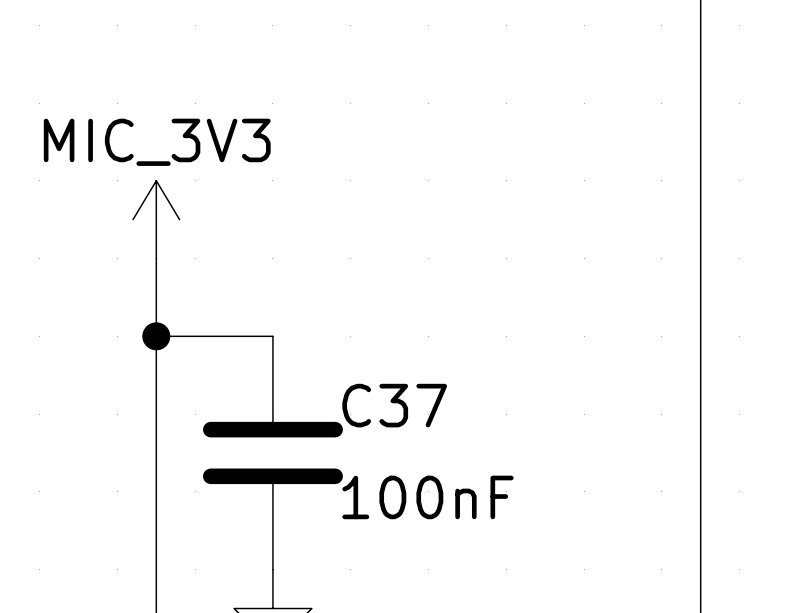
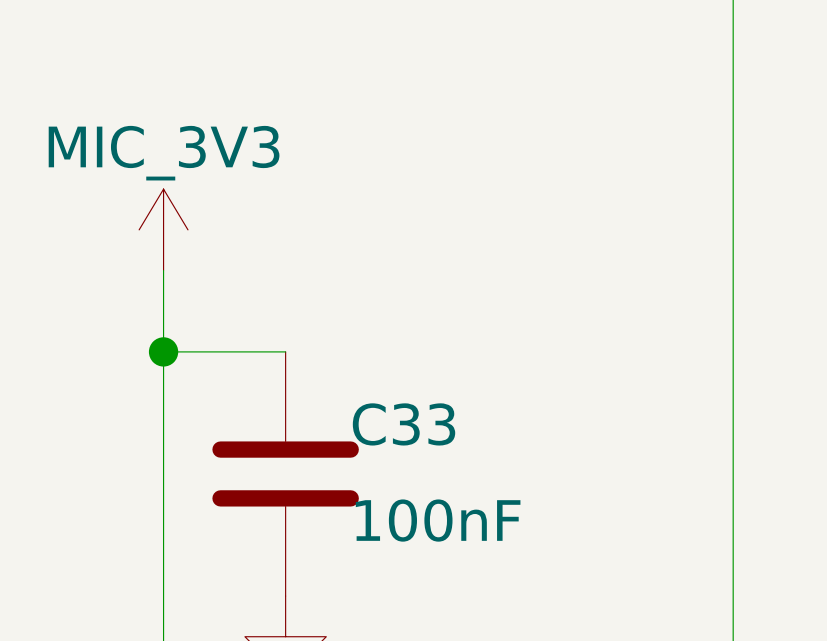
C37 name: C37 (394, 405) -> C33 (404, 424)

